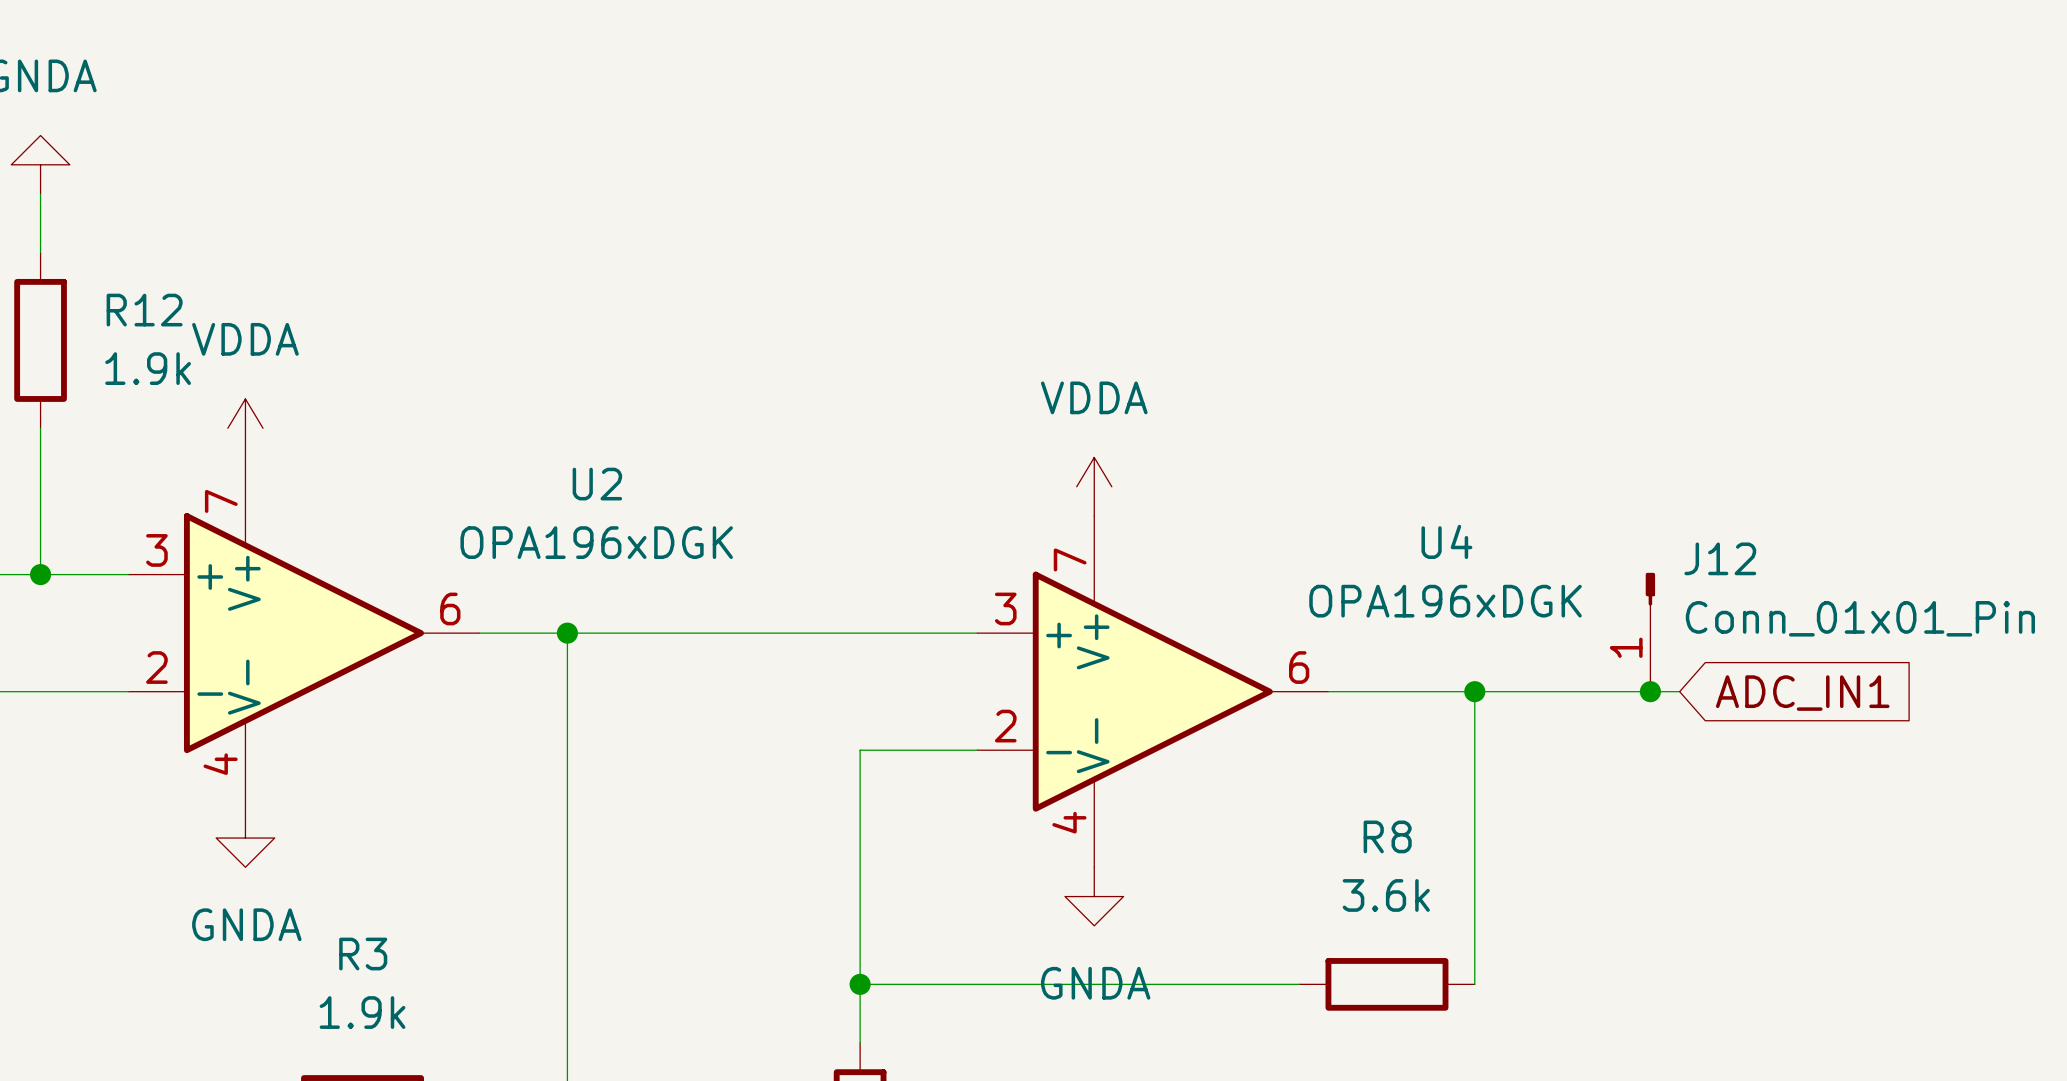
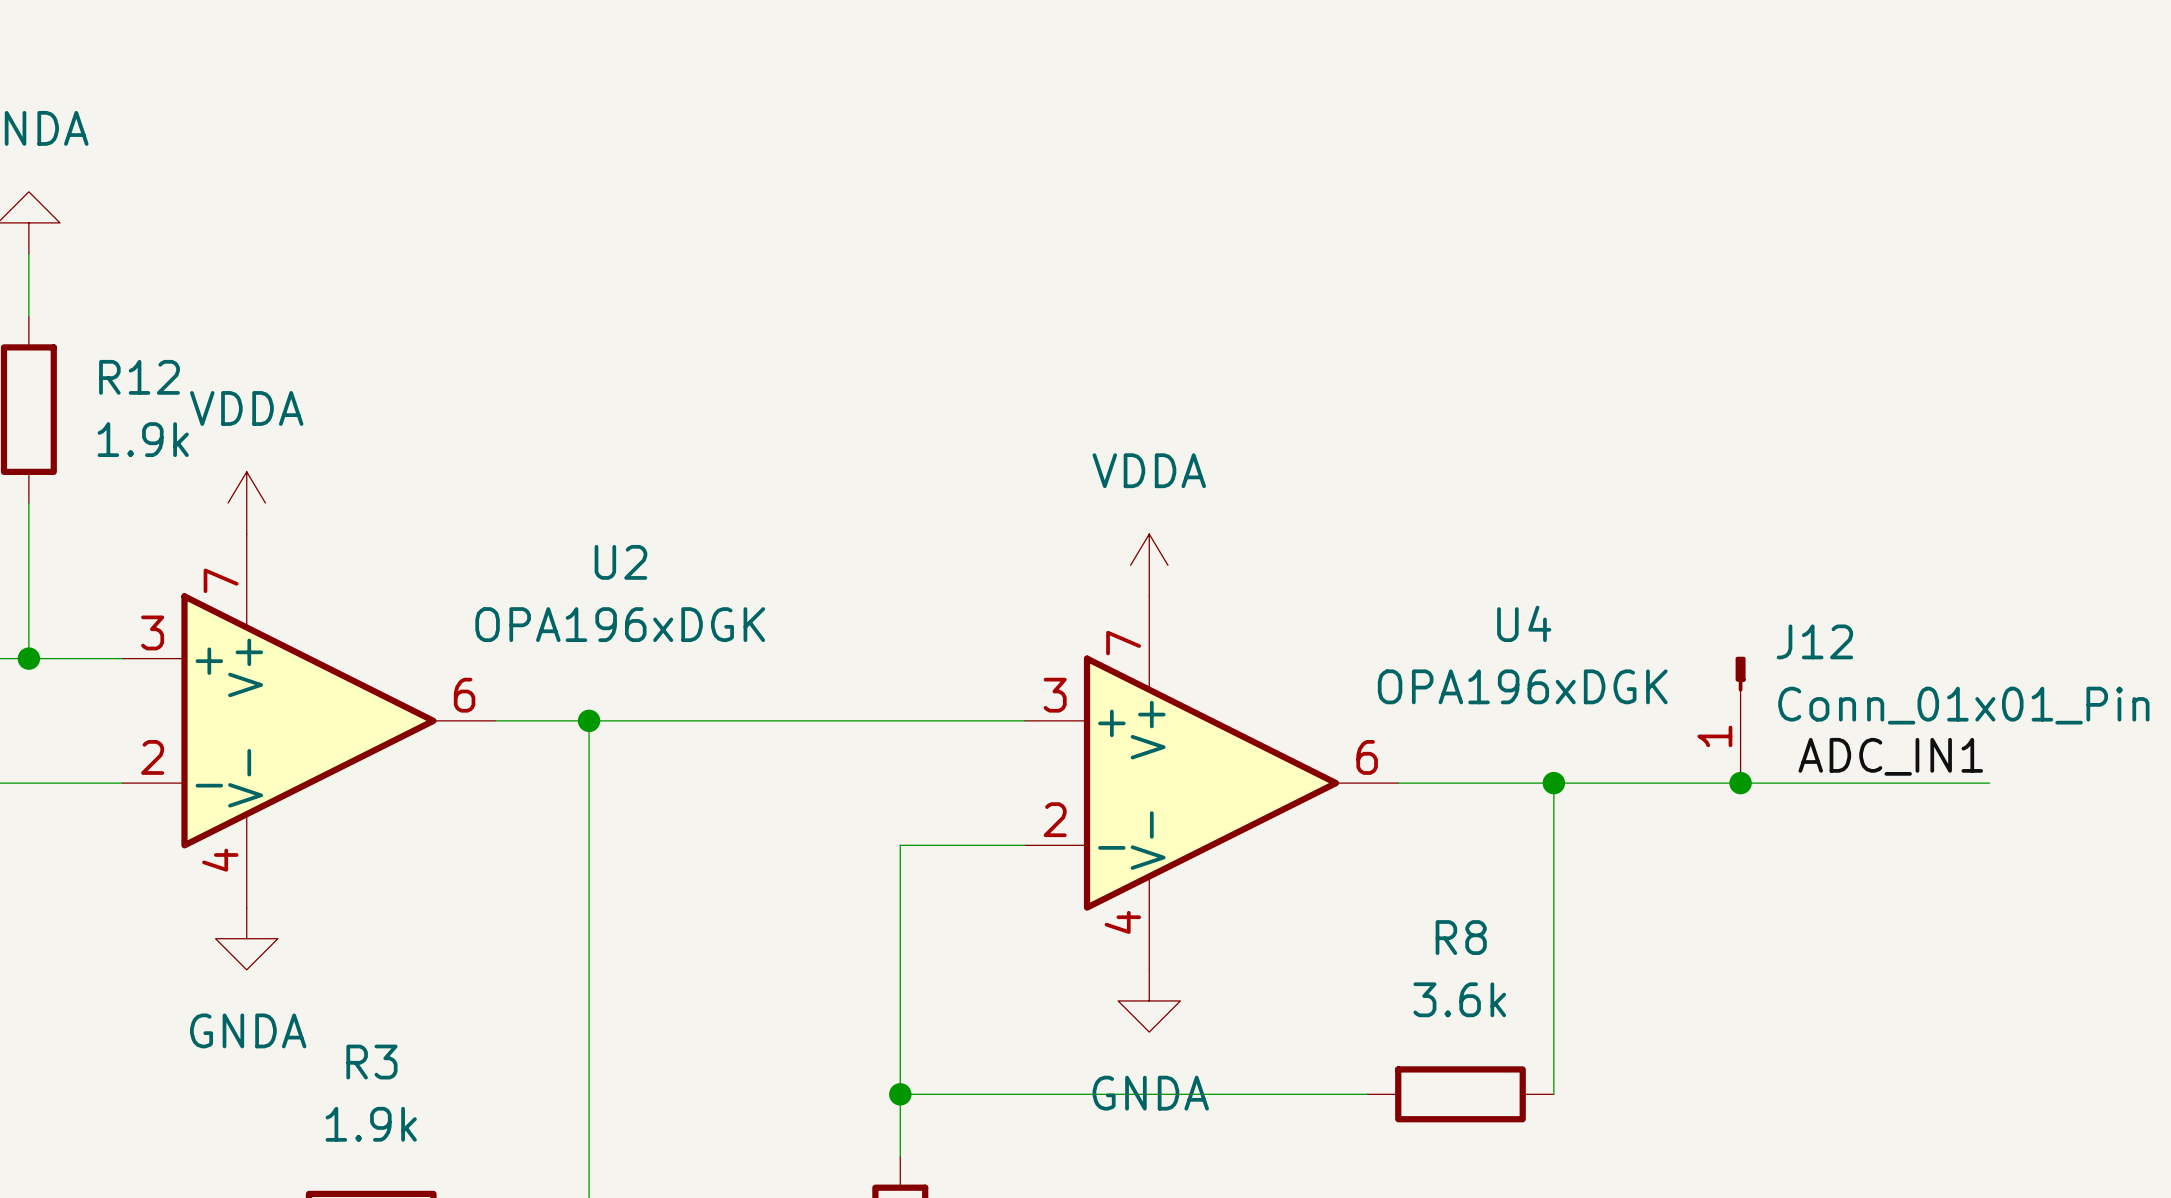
label: none -> ADC_IN1 (1890, 756)
wire: none -> (1771, 783) (1989, 783)
global label: ADC_IN1 (1802, 693) -> none

